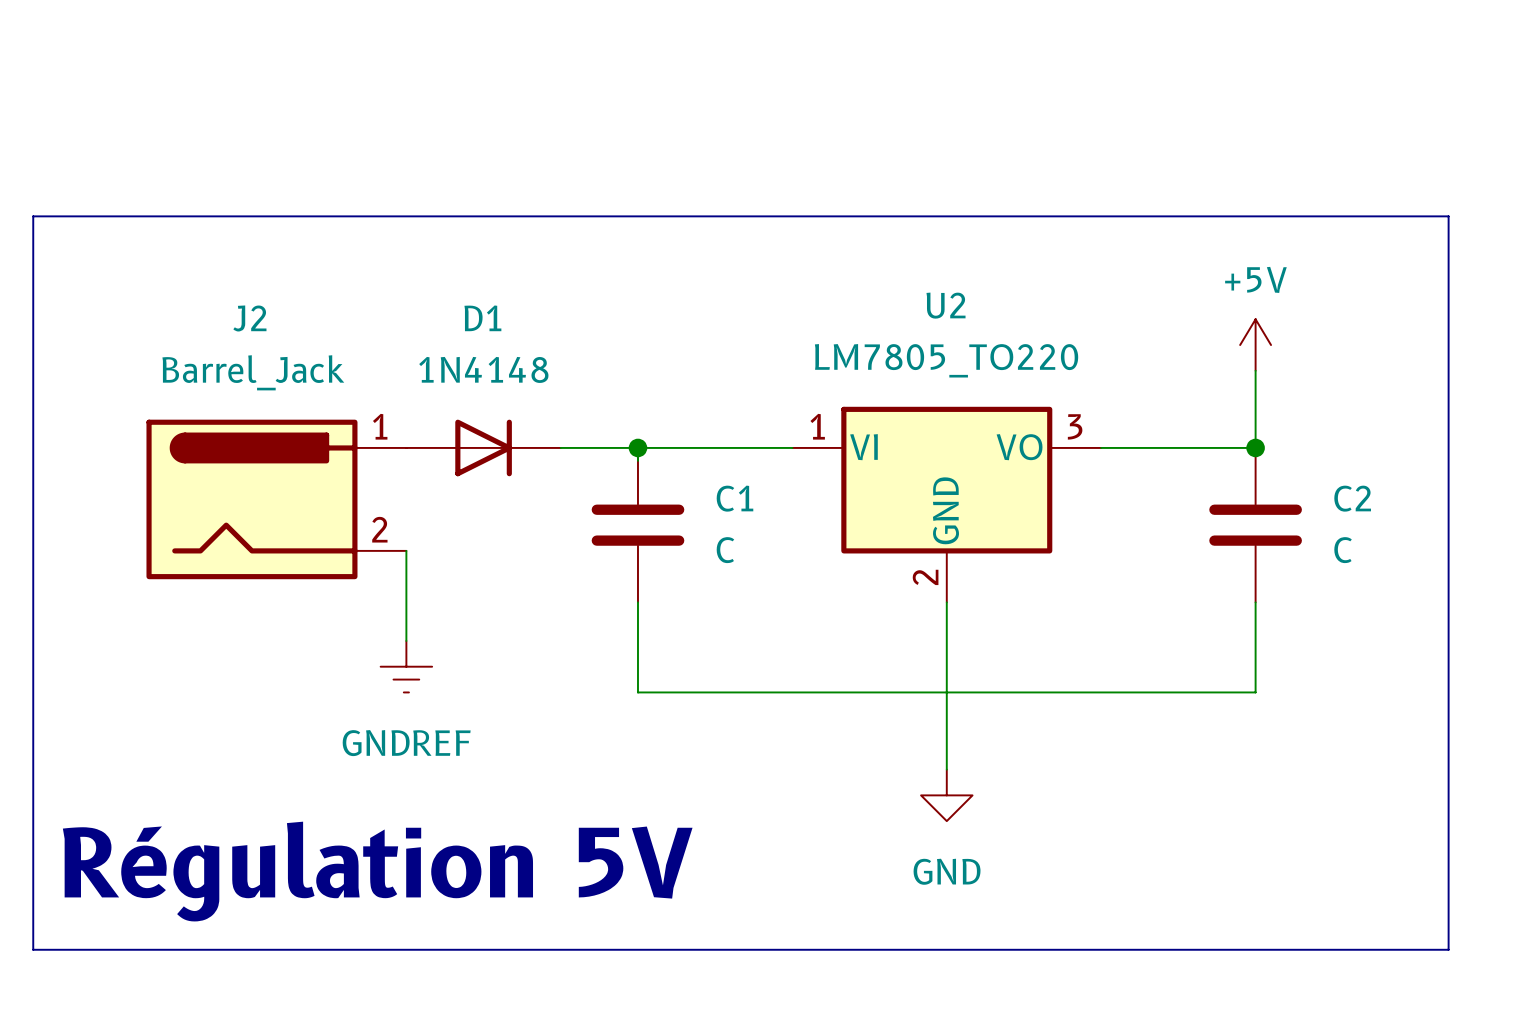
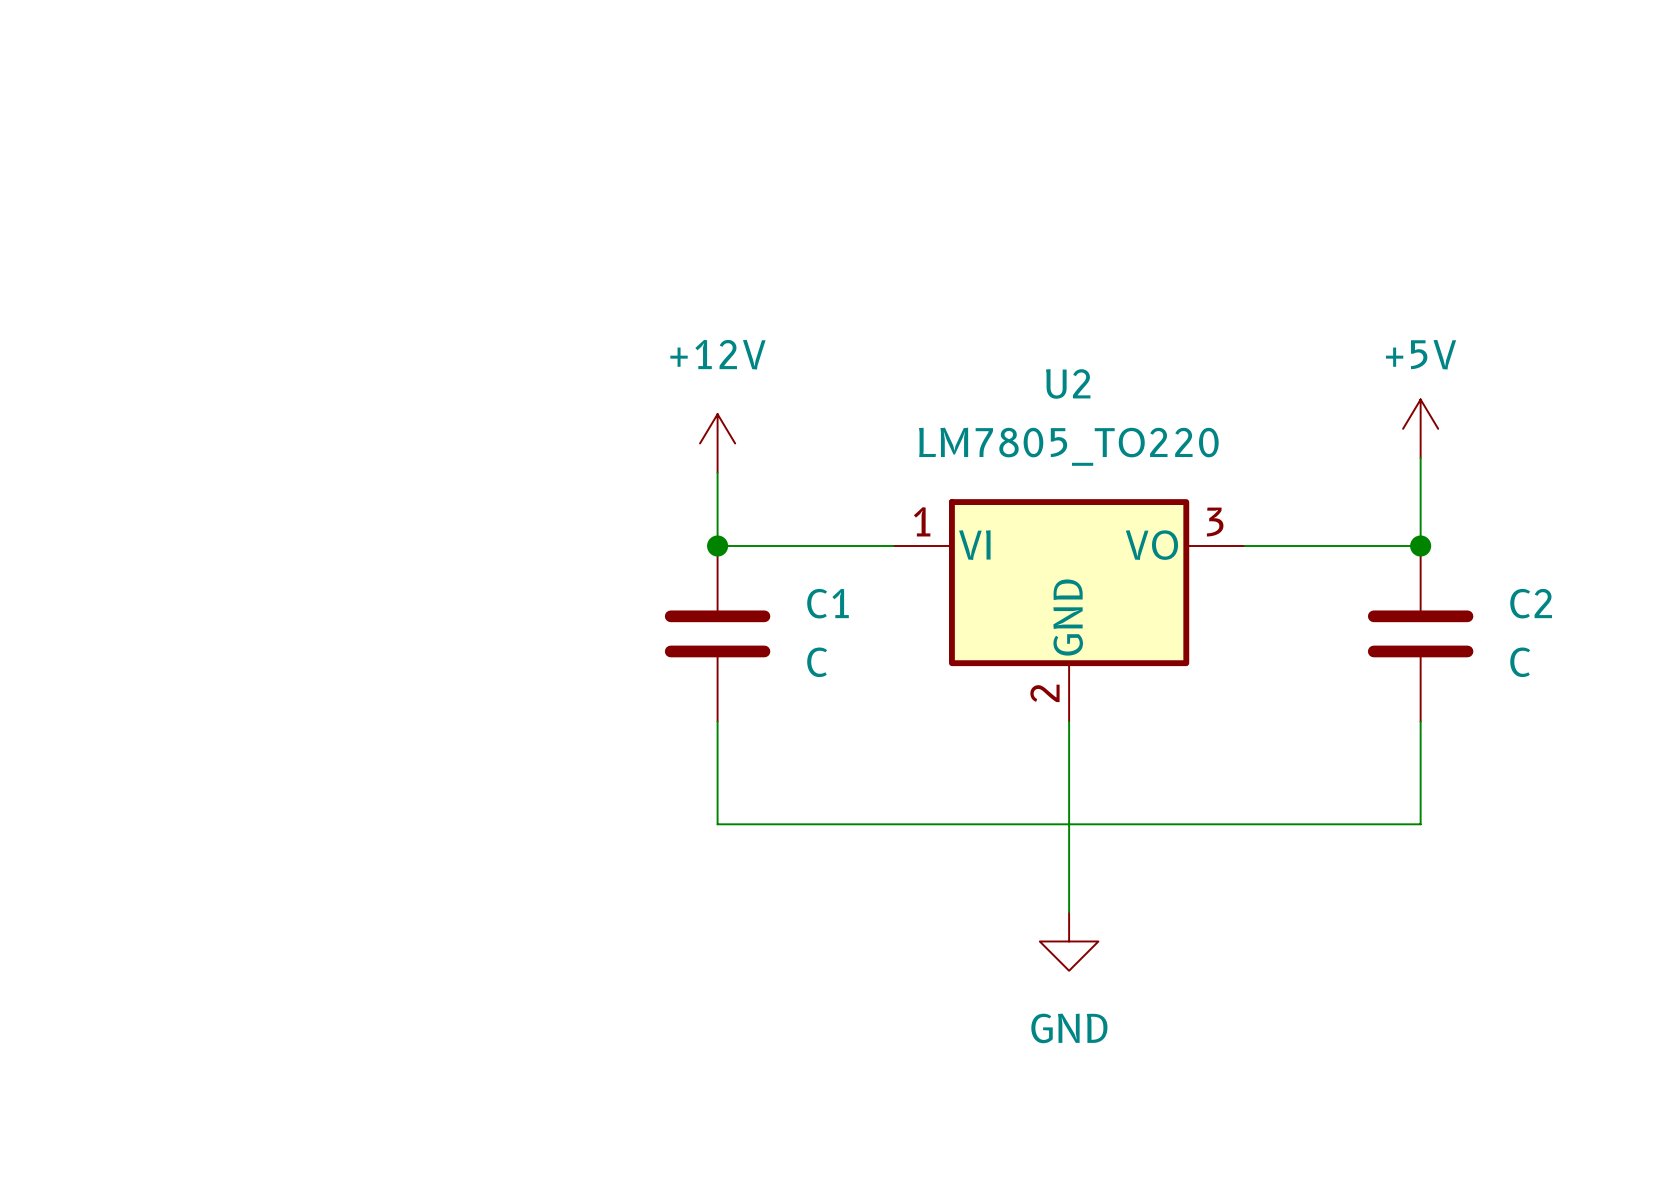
bus: (33, 216) (1448, 216) (1448, 949) (33, 949) (33, 216) -> none
power symbol: none -> +12V (717, 443)
wire: none -> (717, 472) (717, 546)
D1: 1N4148 (483, 447) -> none
wire: (560, 447) (637, 447) (637, 460) -> none
J2: Barrel_Jack (276, 499) -> none
wire: (406, 550) (406, 640) -> none
power symbol: GNDREF (406, 666) -> none
text: Régulation 5V (377, 871) -> none

